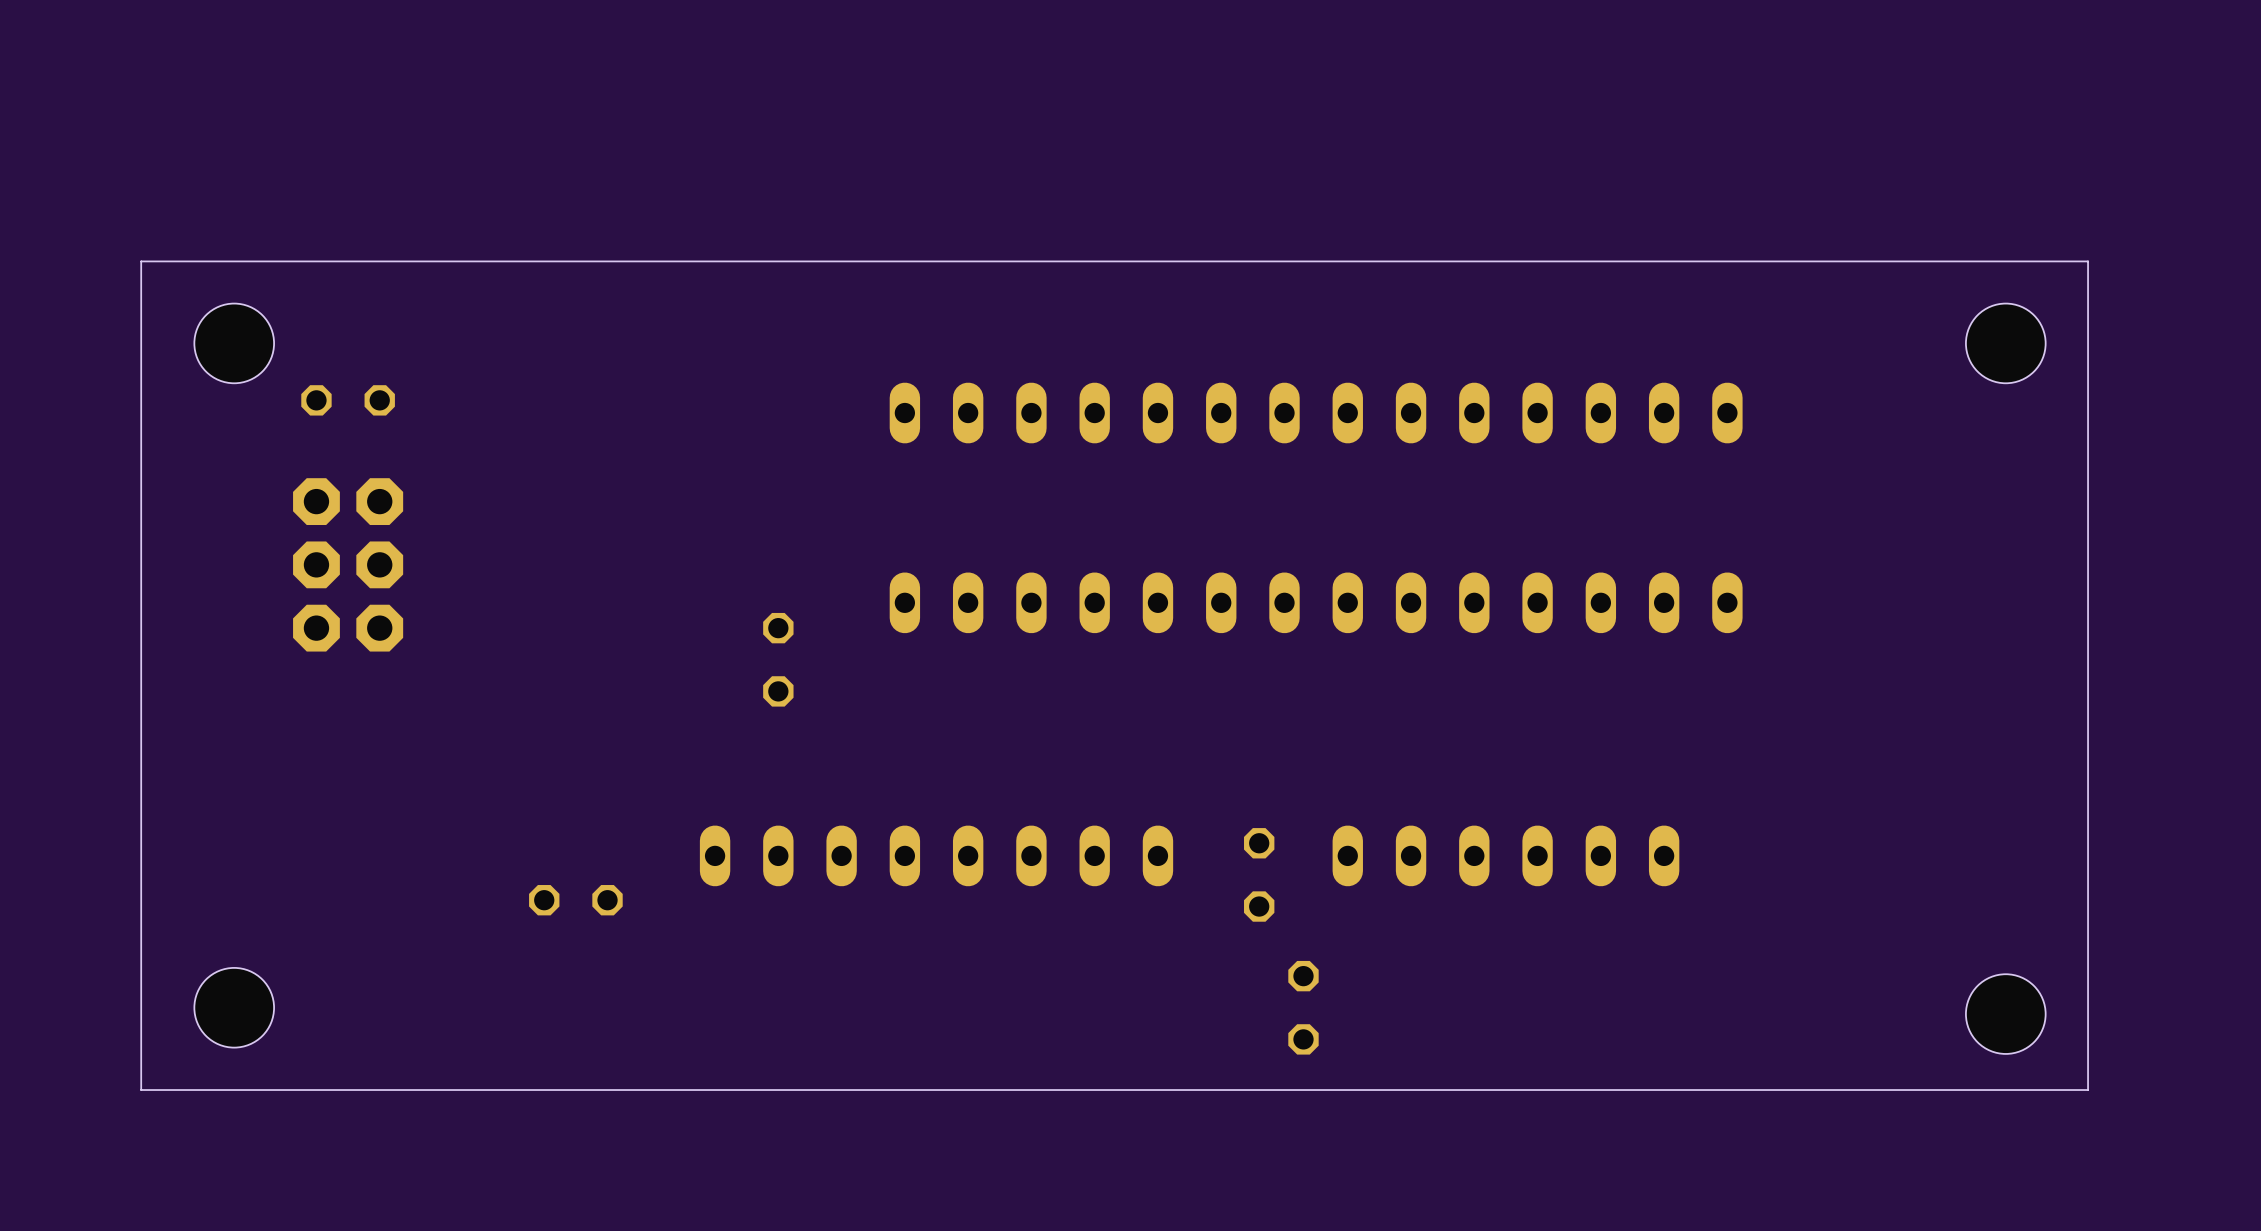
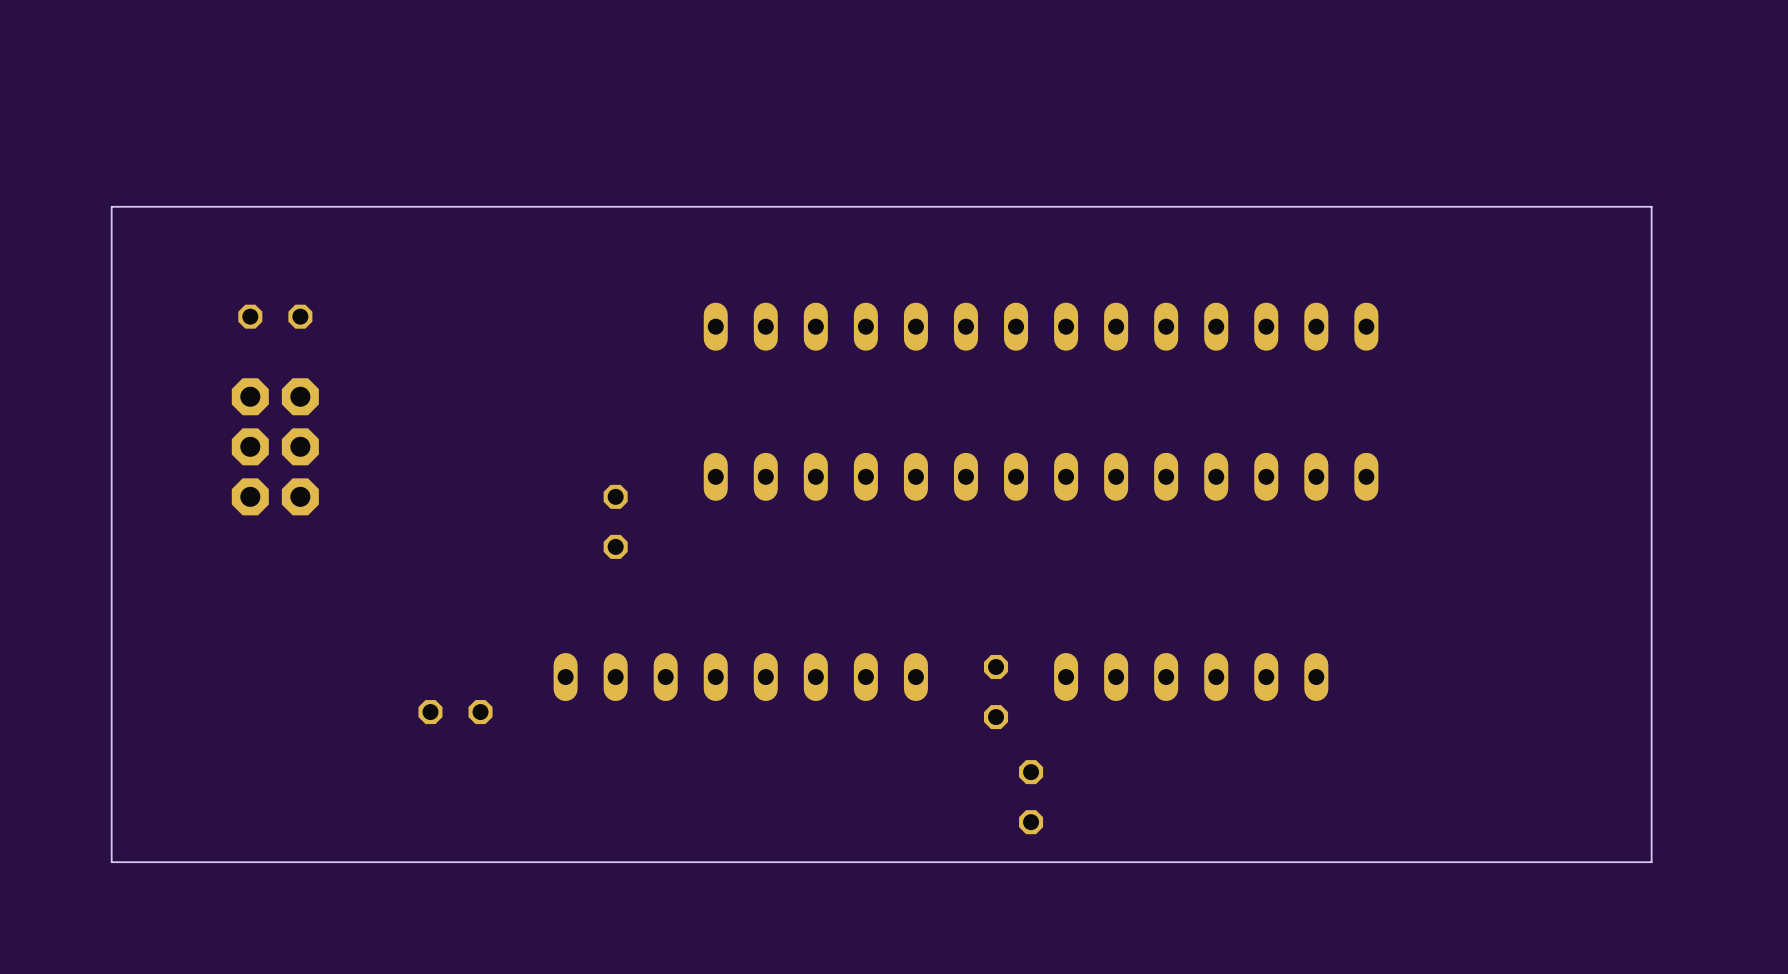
hole: (234, 343) -> none
hole: (2005, 343) -> none
hole: (234, 1007) -> none
hole: (2005, 1014) -> none

